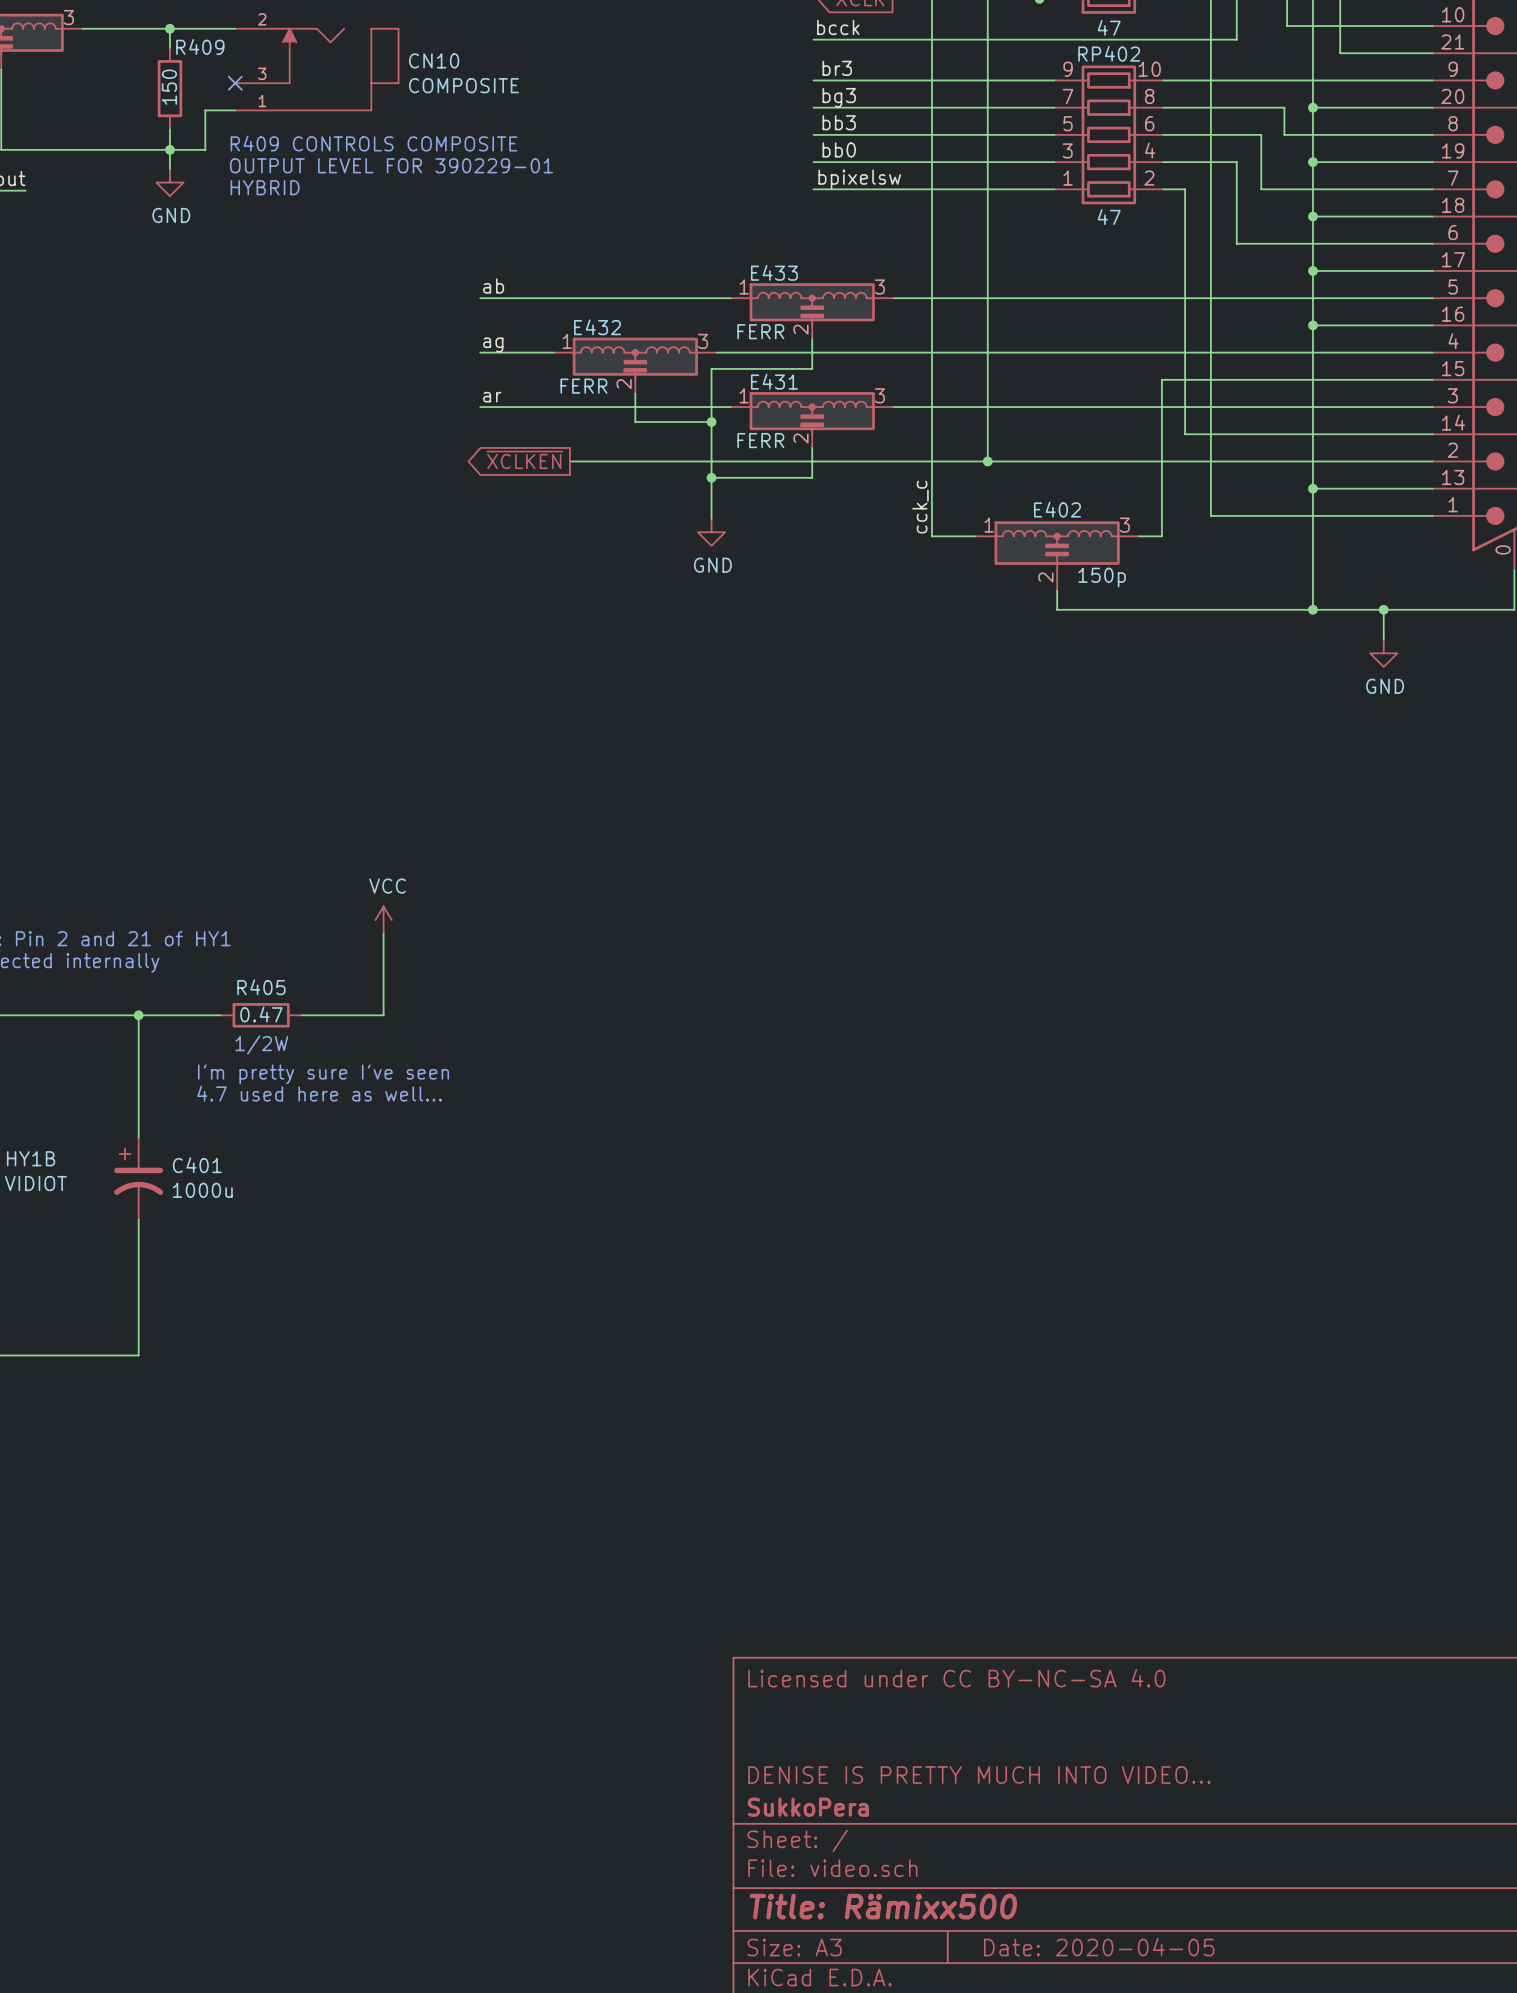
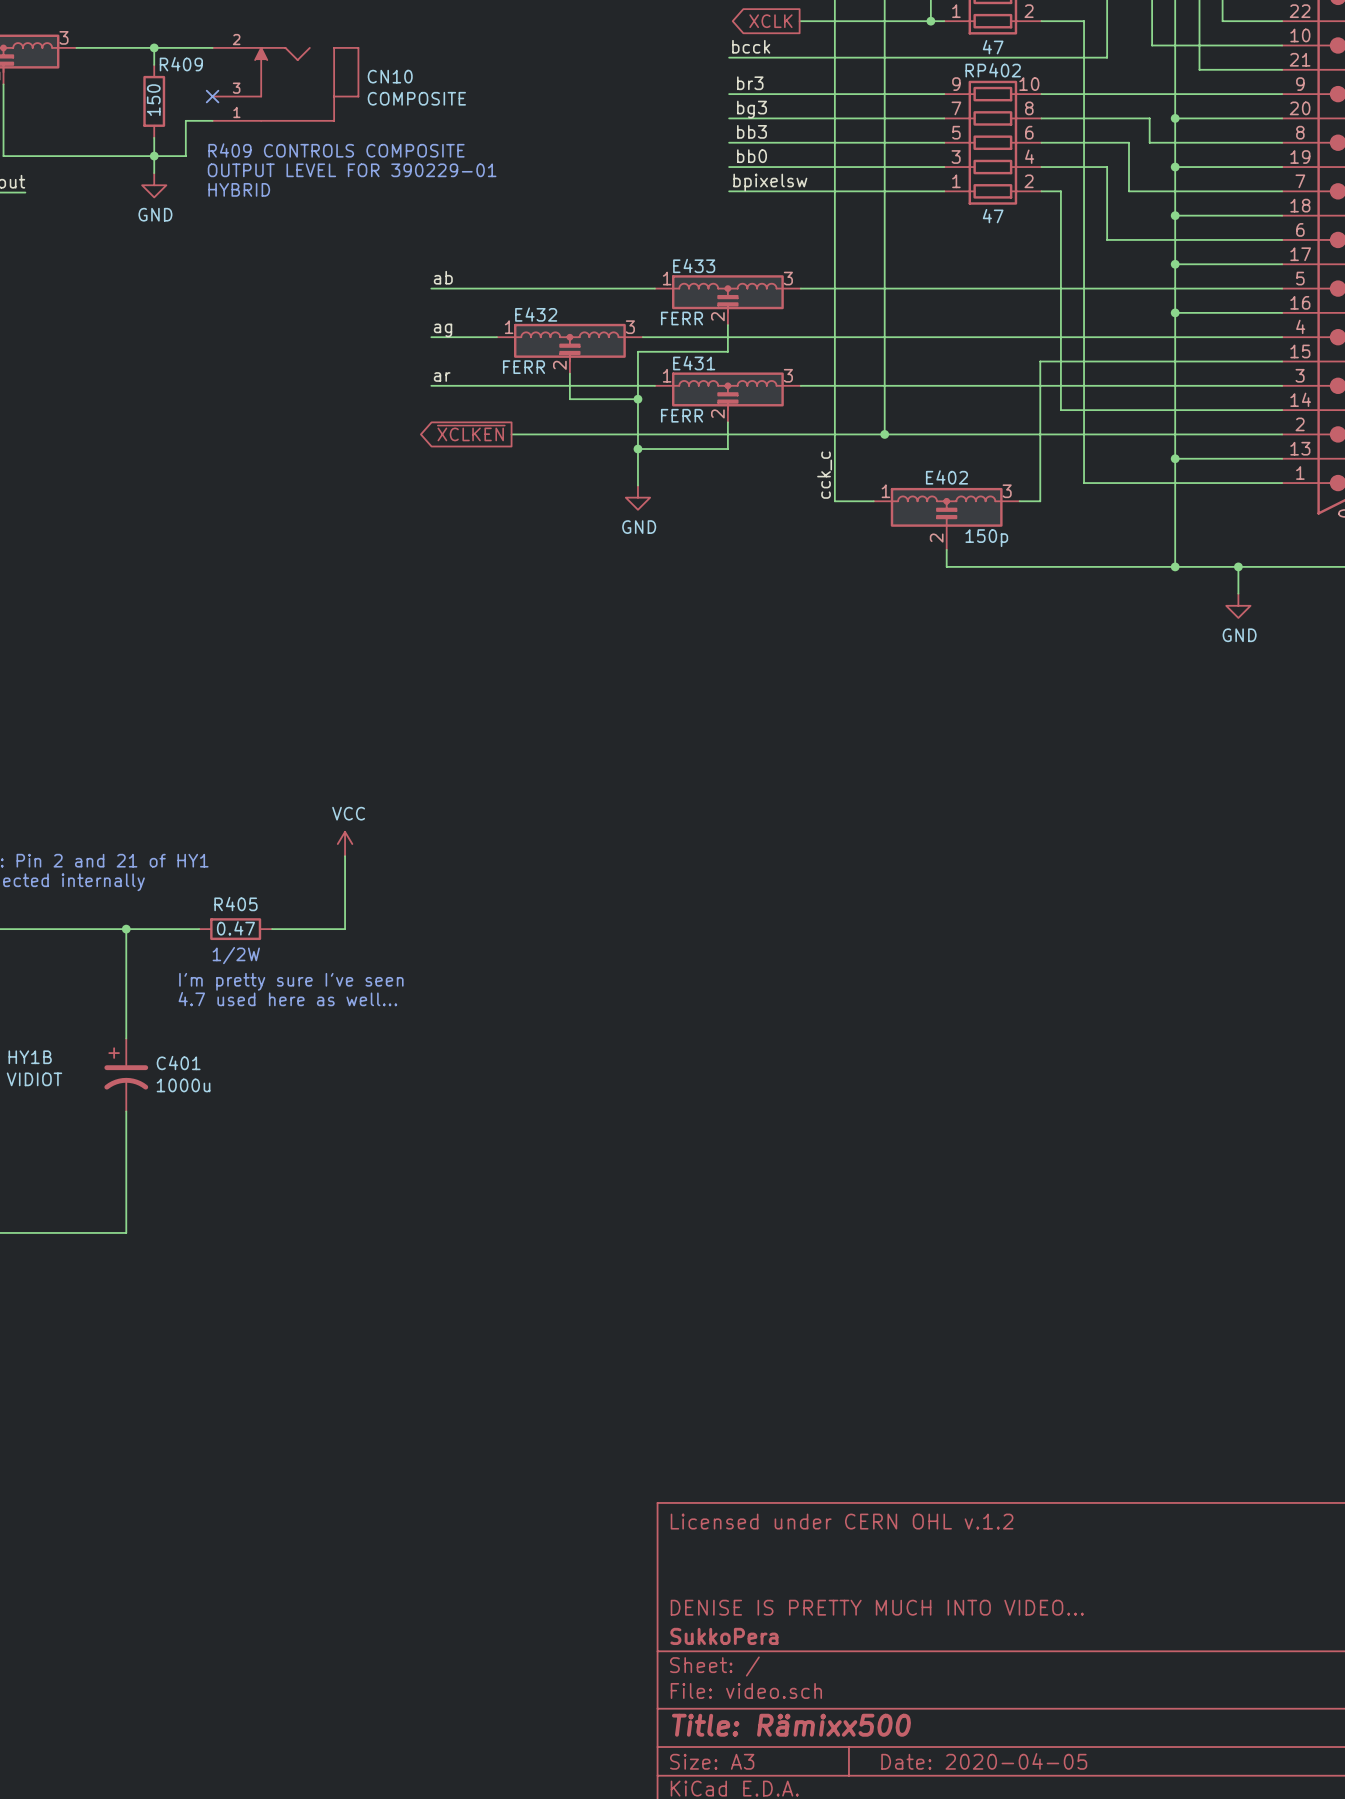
title block: Licensed under CC BY-NC-SA 4.0 (956, 1678) -> Licensed under CERN OHL v.1.2 (842, 1521)

